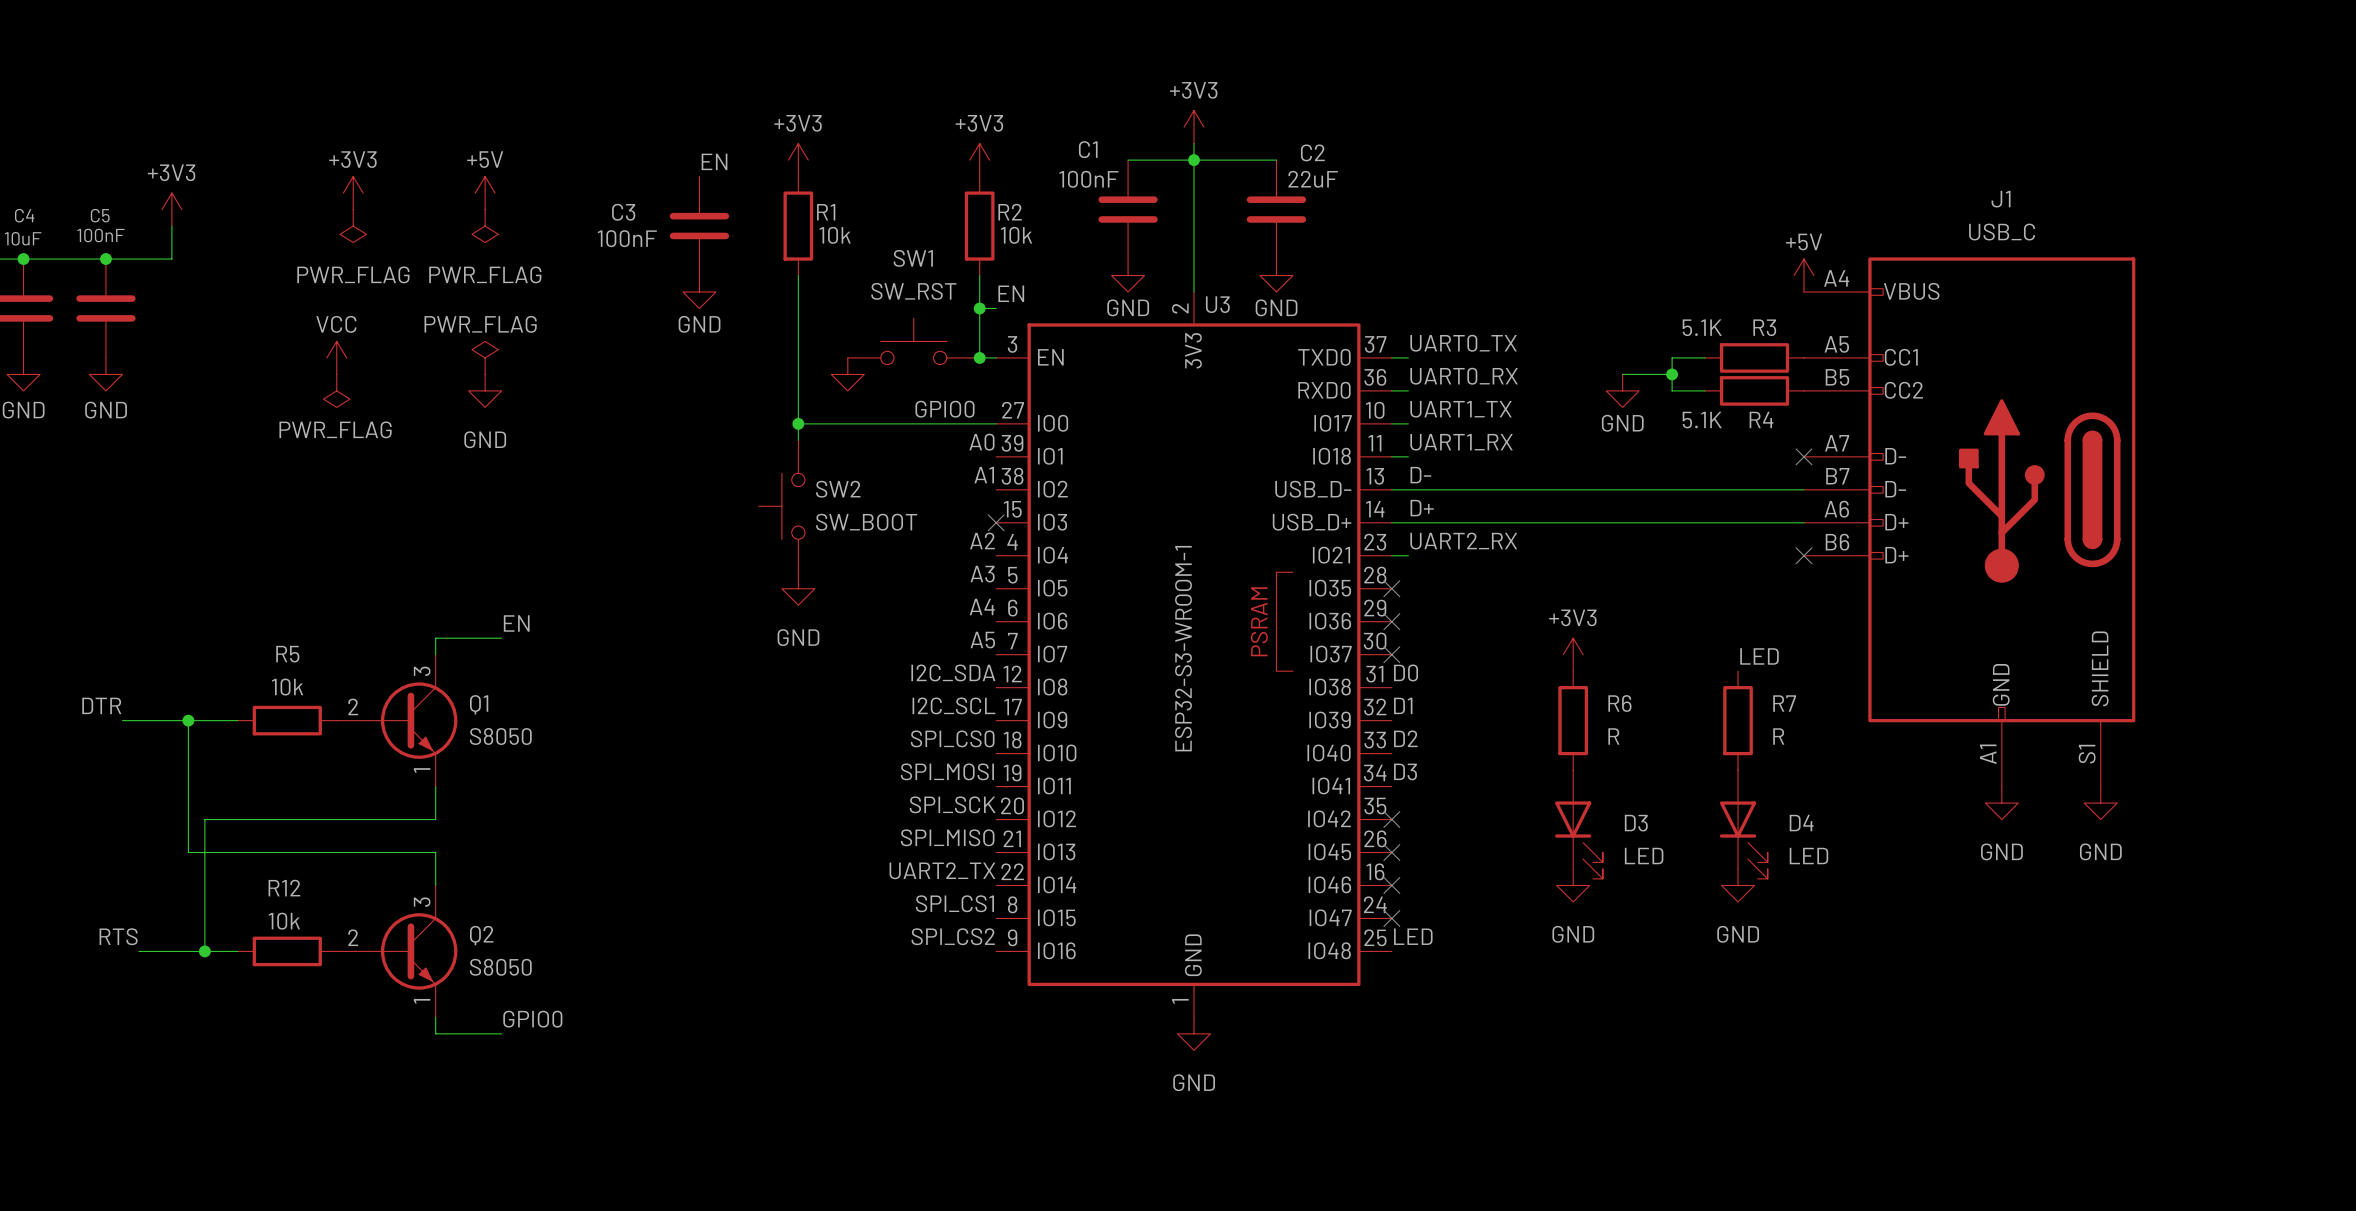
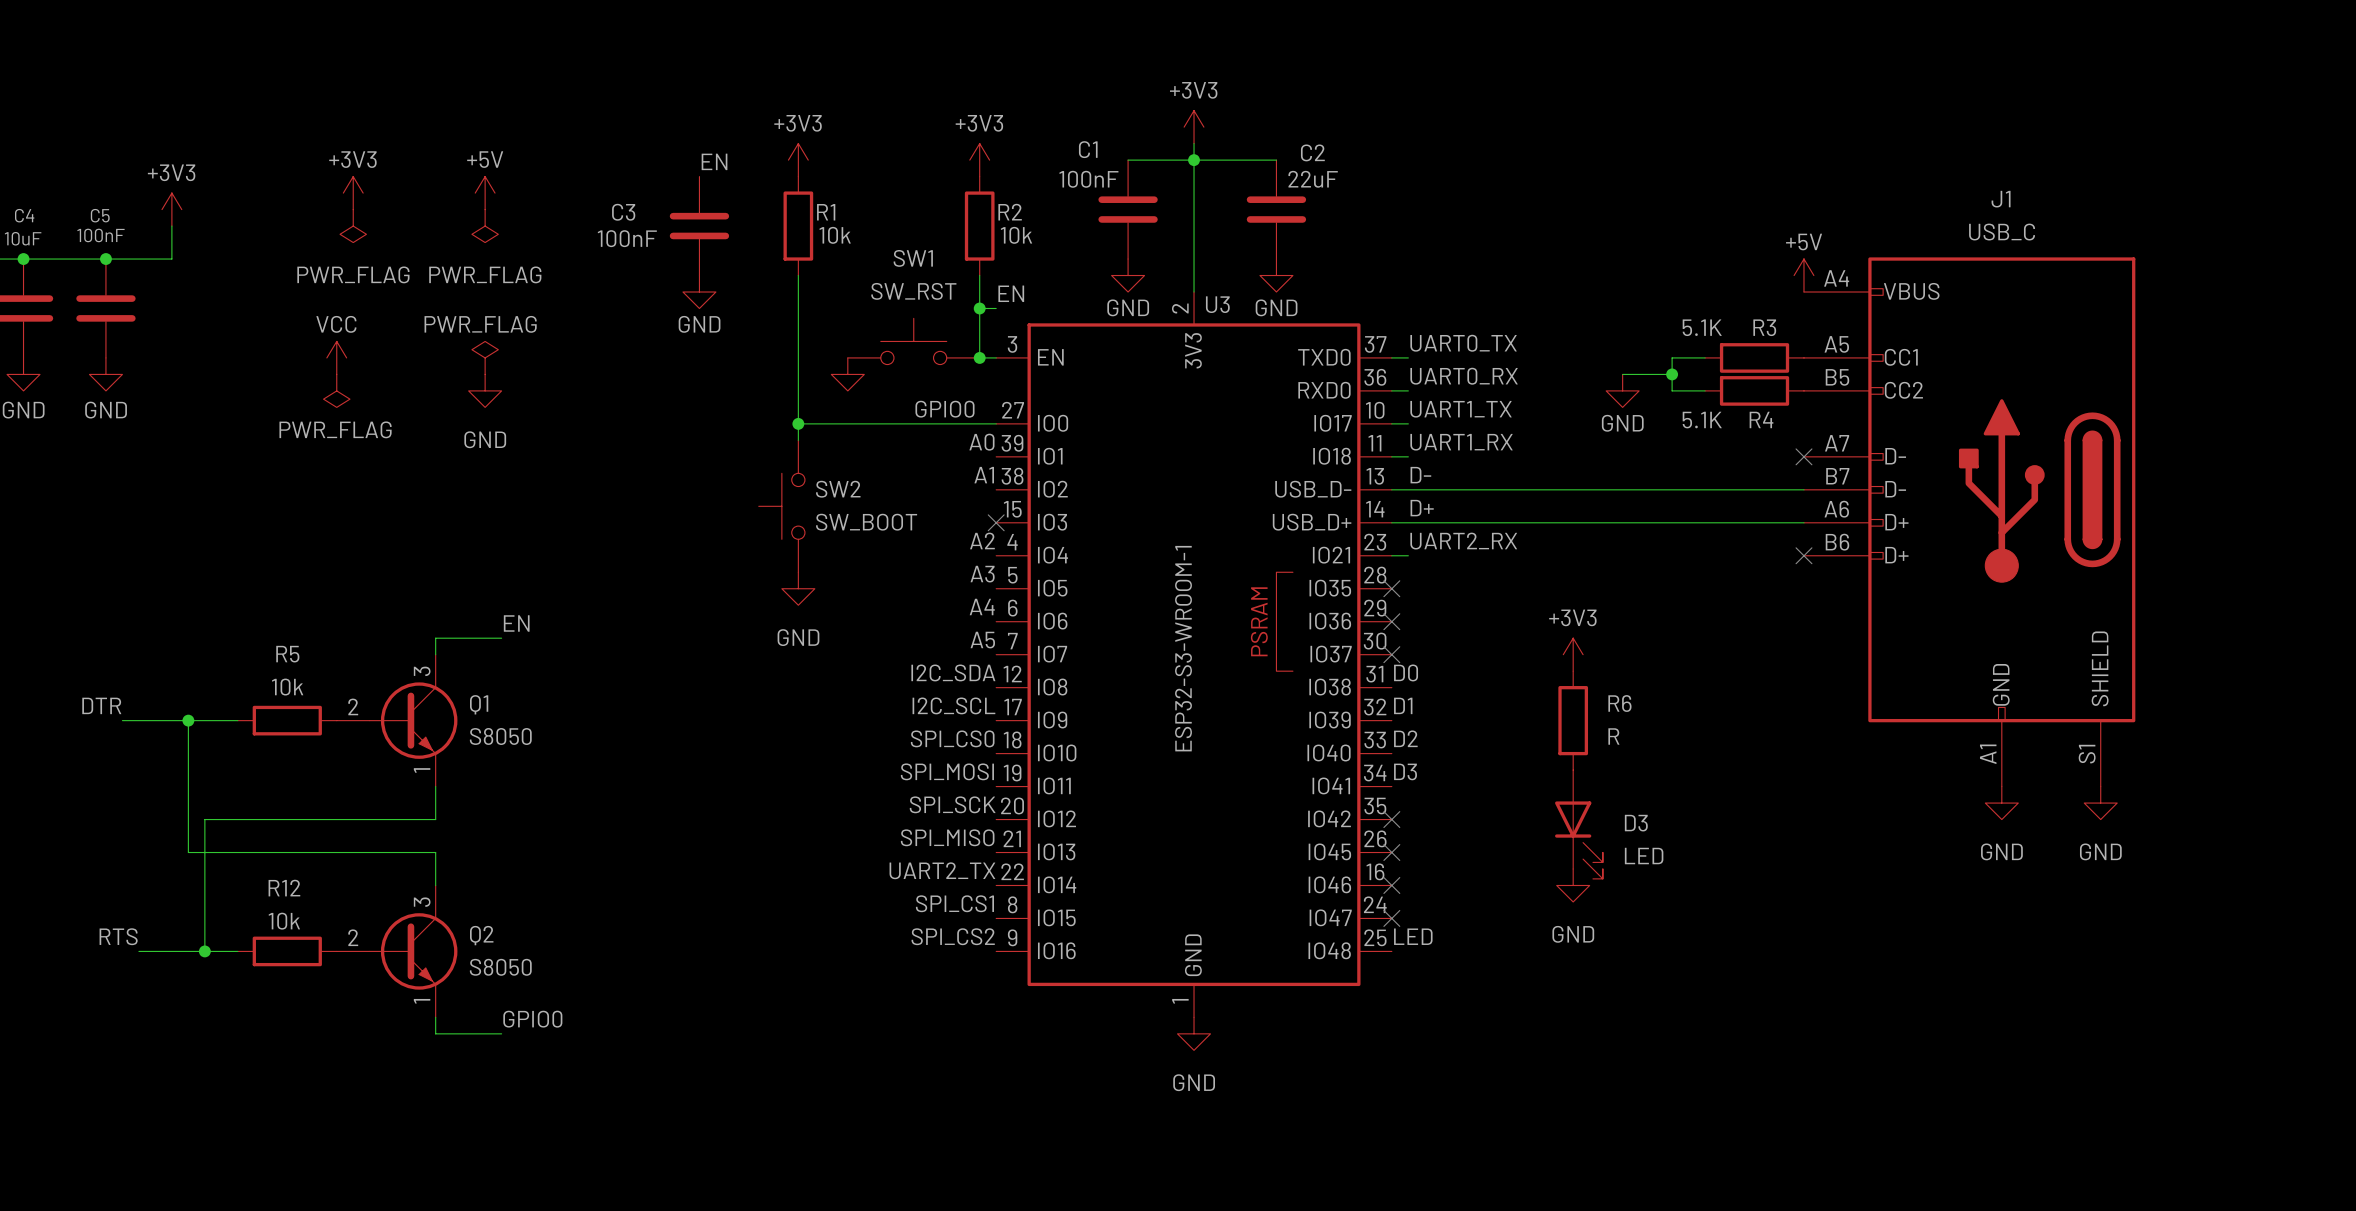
label: LED (1759, 656) -> none
R7: R (1738, 720) -> none
D4: LED (1743, 824) -> none
power symbol: GND (1738, 885) -> none

